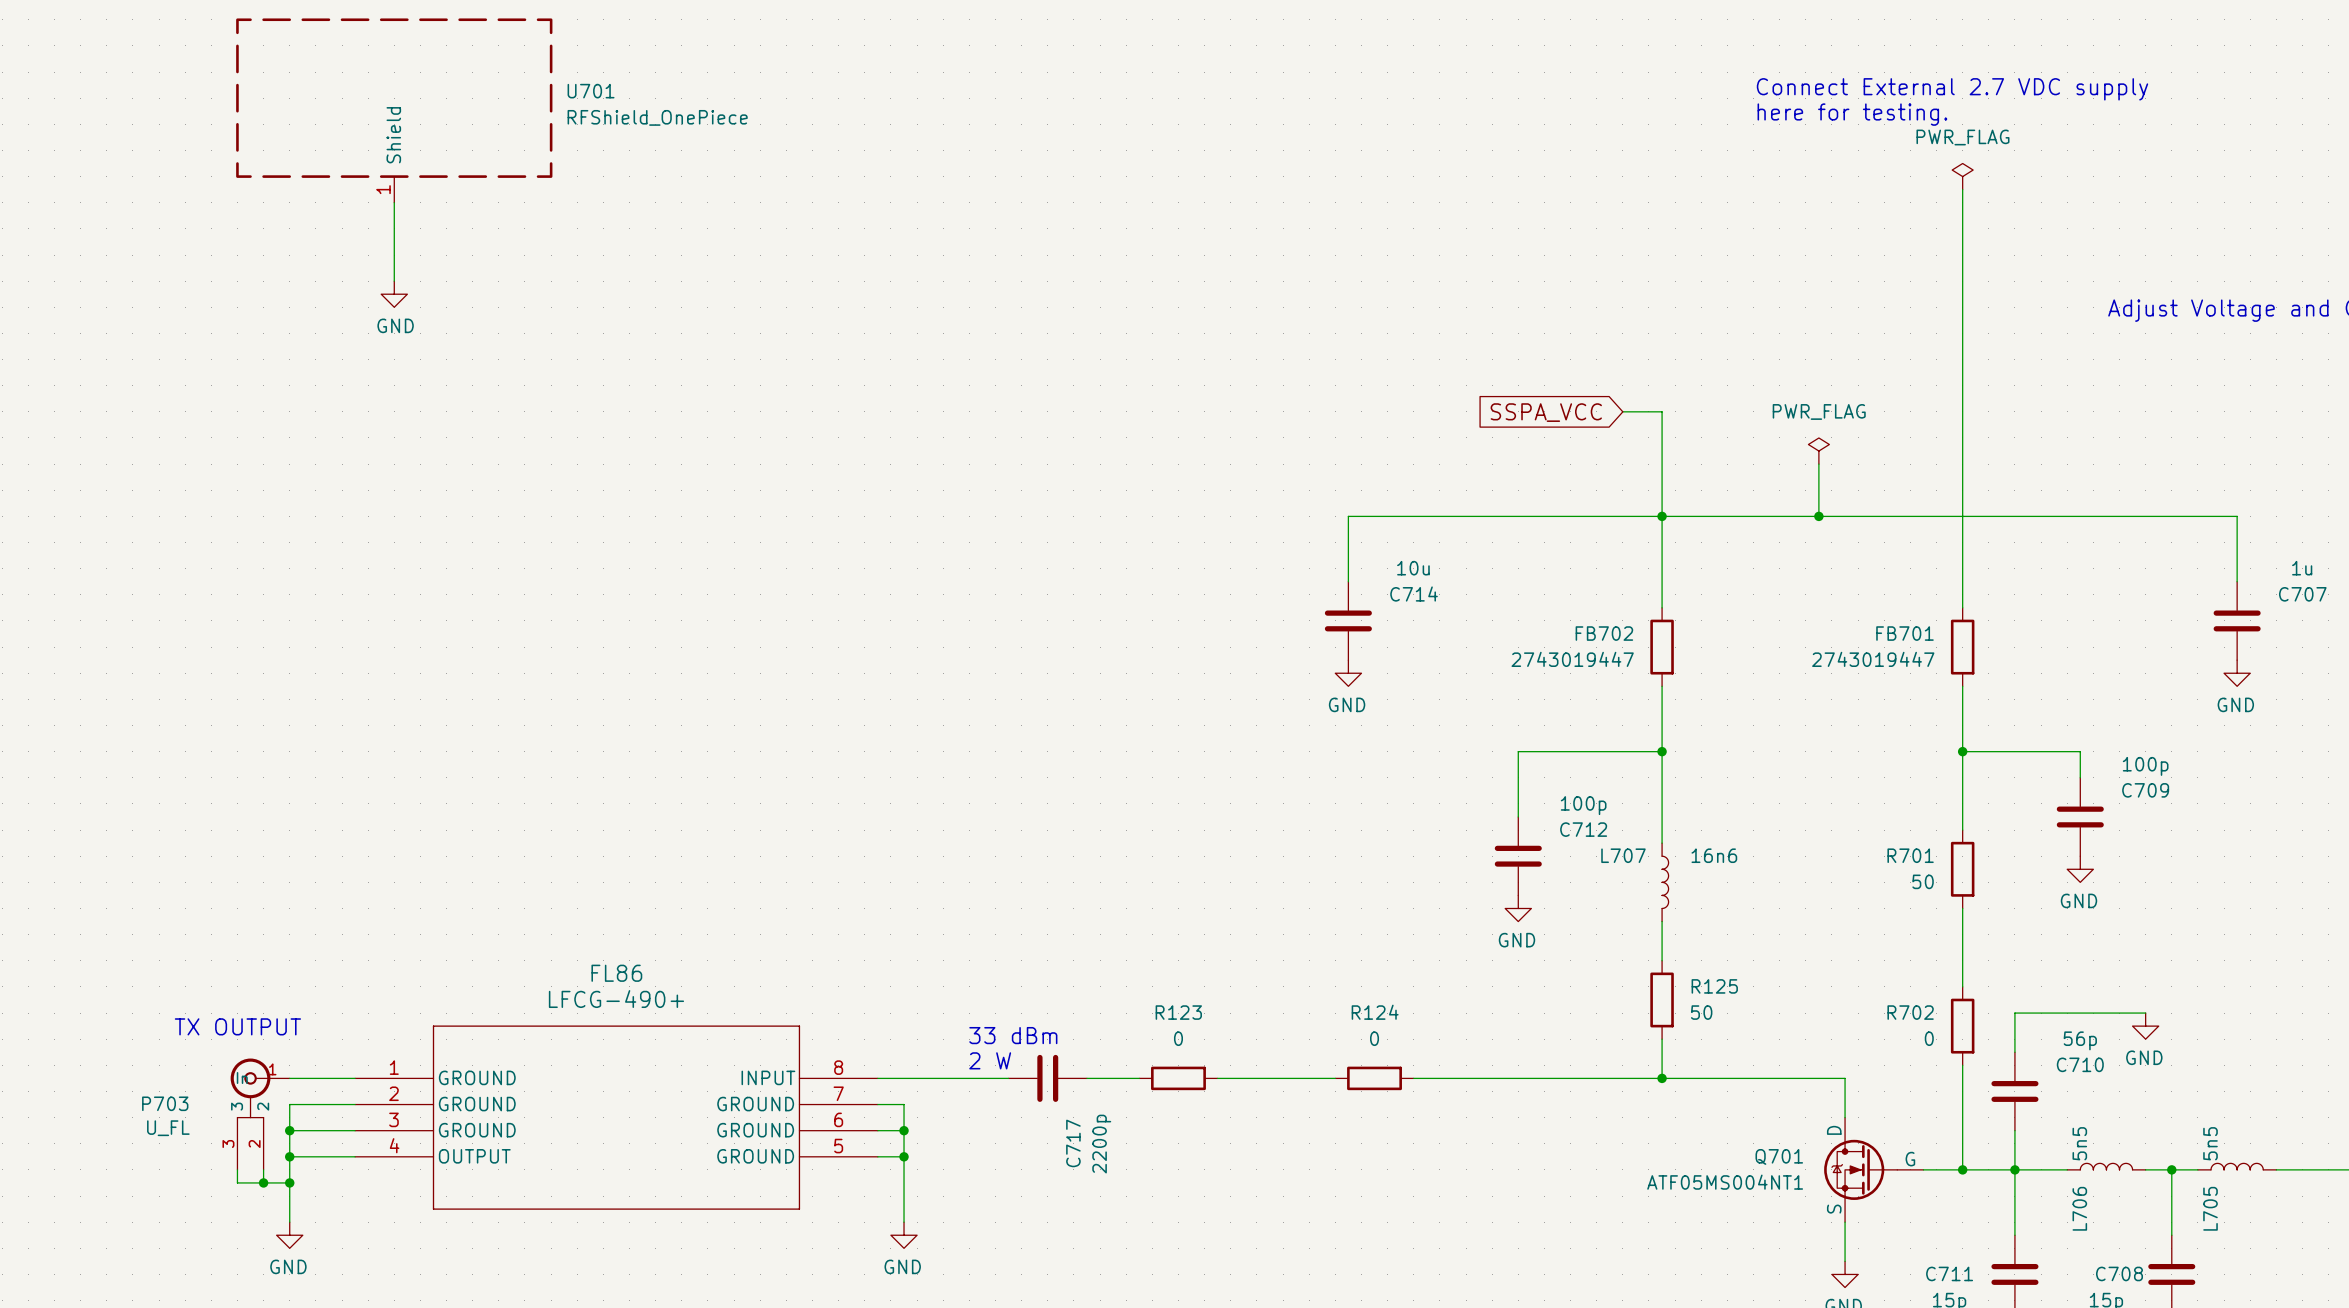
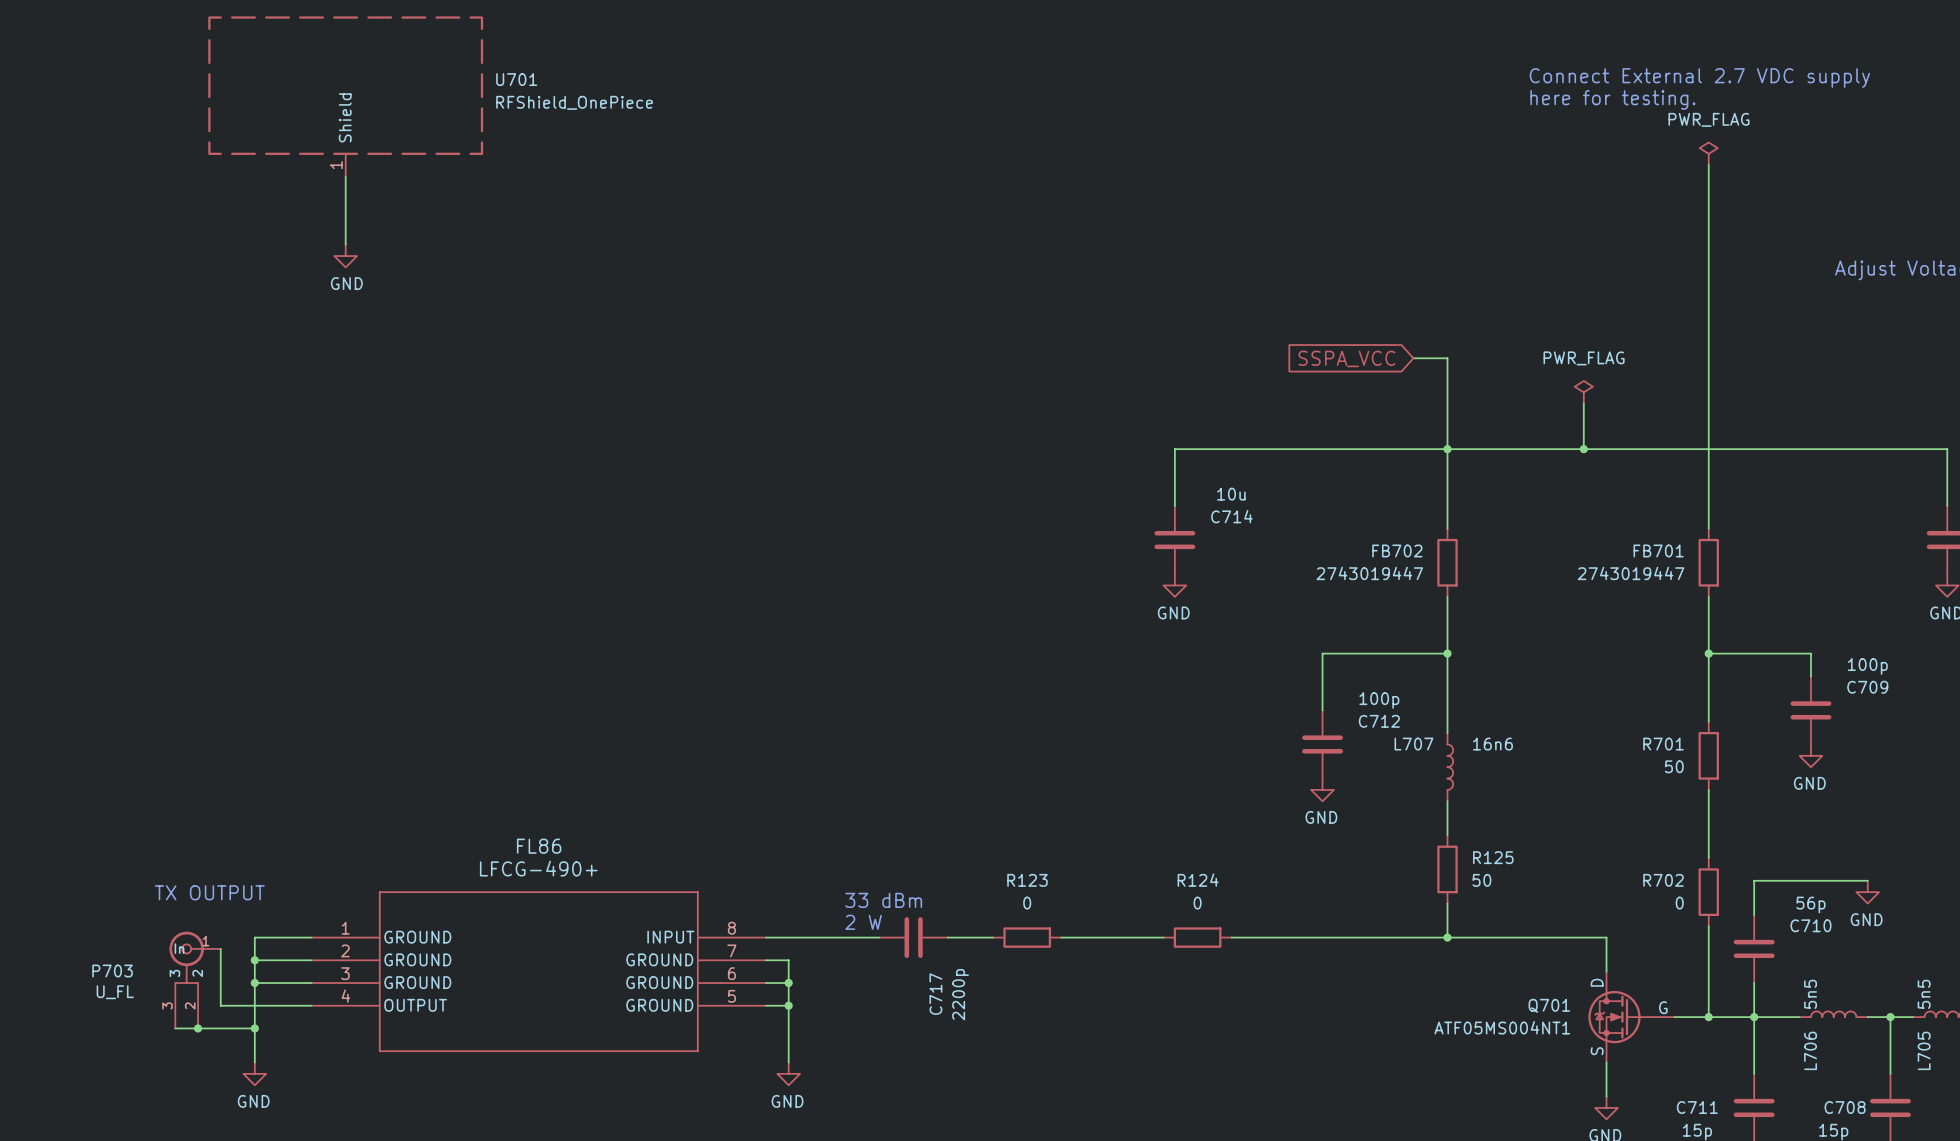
wire: none -> (254, 937) (254, 960)
wire: none -> (220, 948) (220, 1005) (254, 1005)
junction: none -> (254, 960)
P703 position: (260, 1114) -> (195, 980)
junction: (289, 1156) -> none
wire: (237, 1169) (237, 1182) -> (175, 1028) (209, 1028)
wire: (263, 1169) (263, 1182) -> none
junction: none -> (198, 1028)
junction: (263, 1182) -> none

